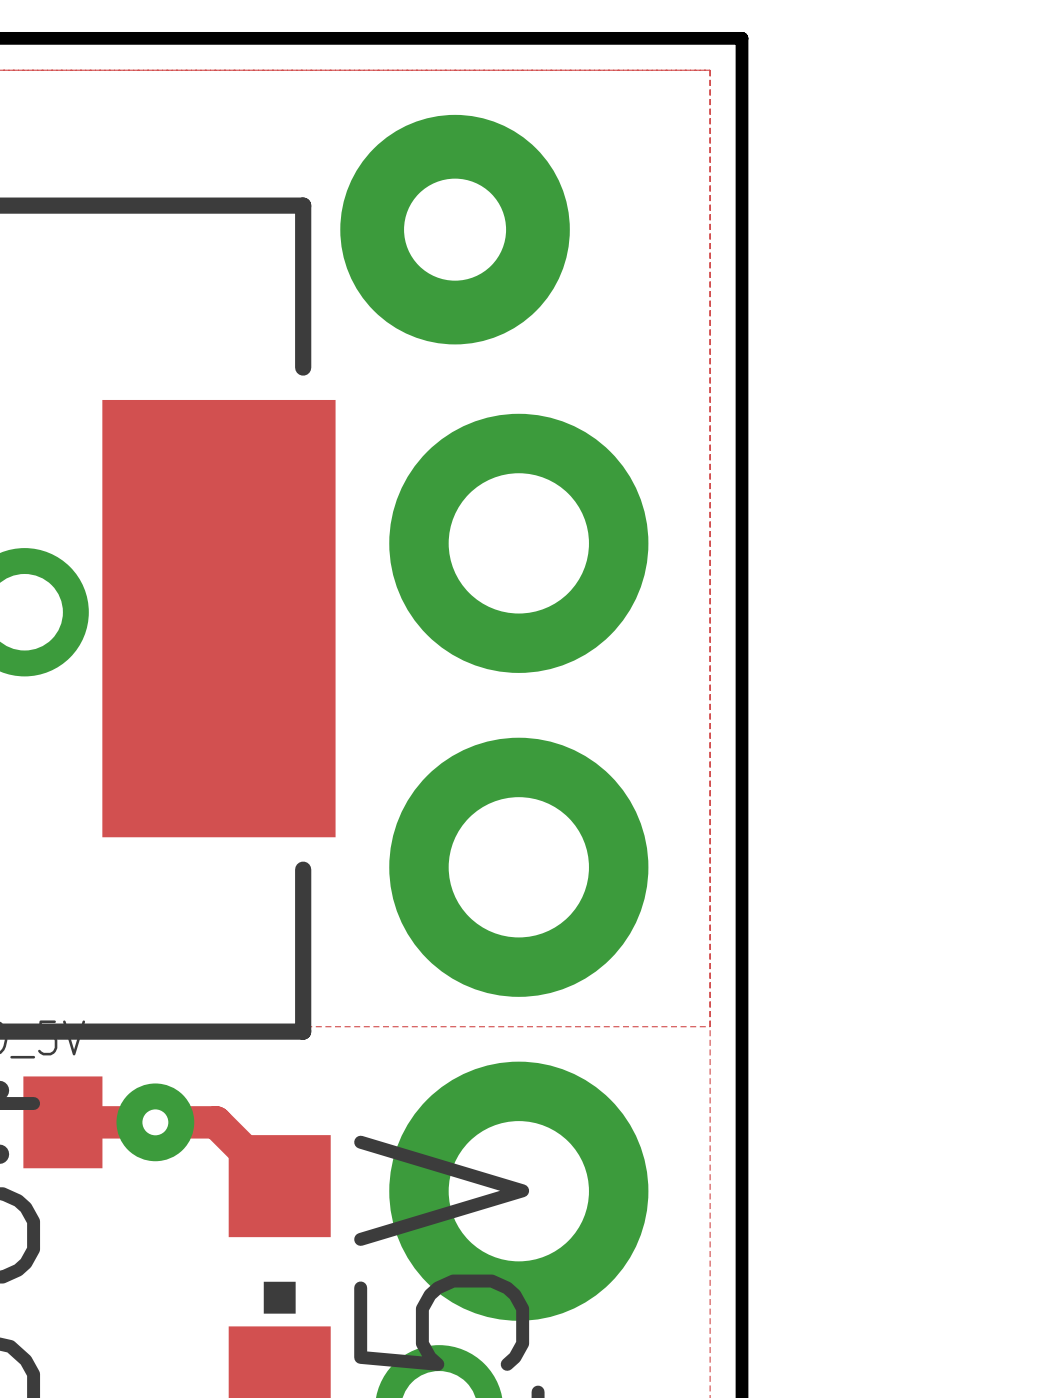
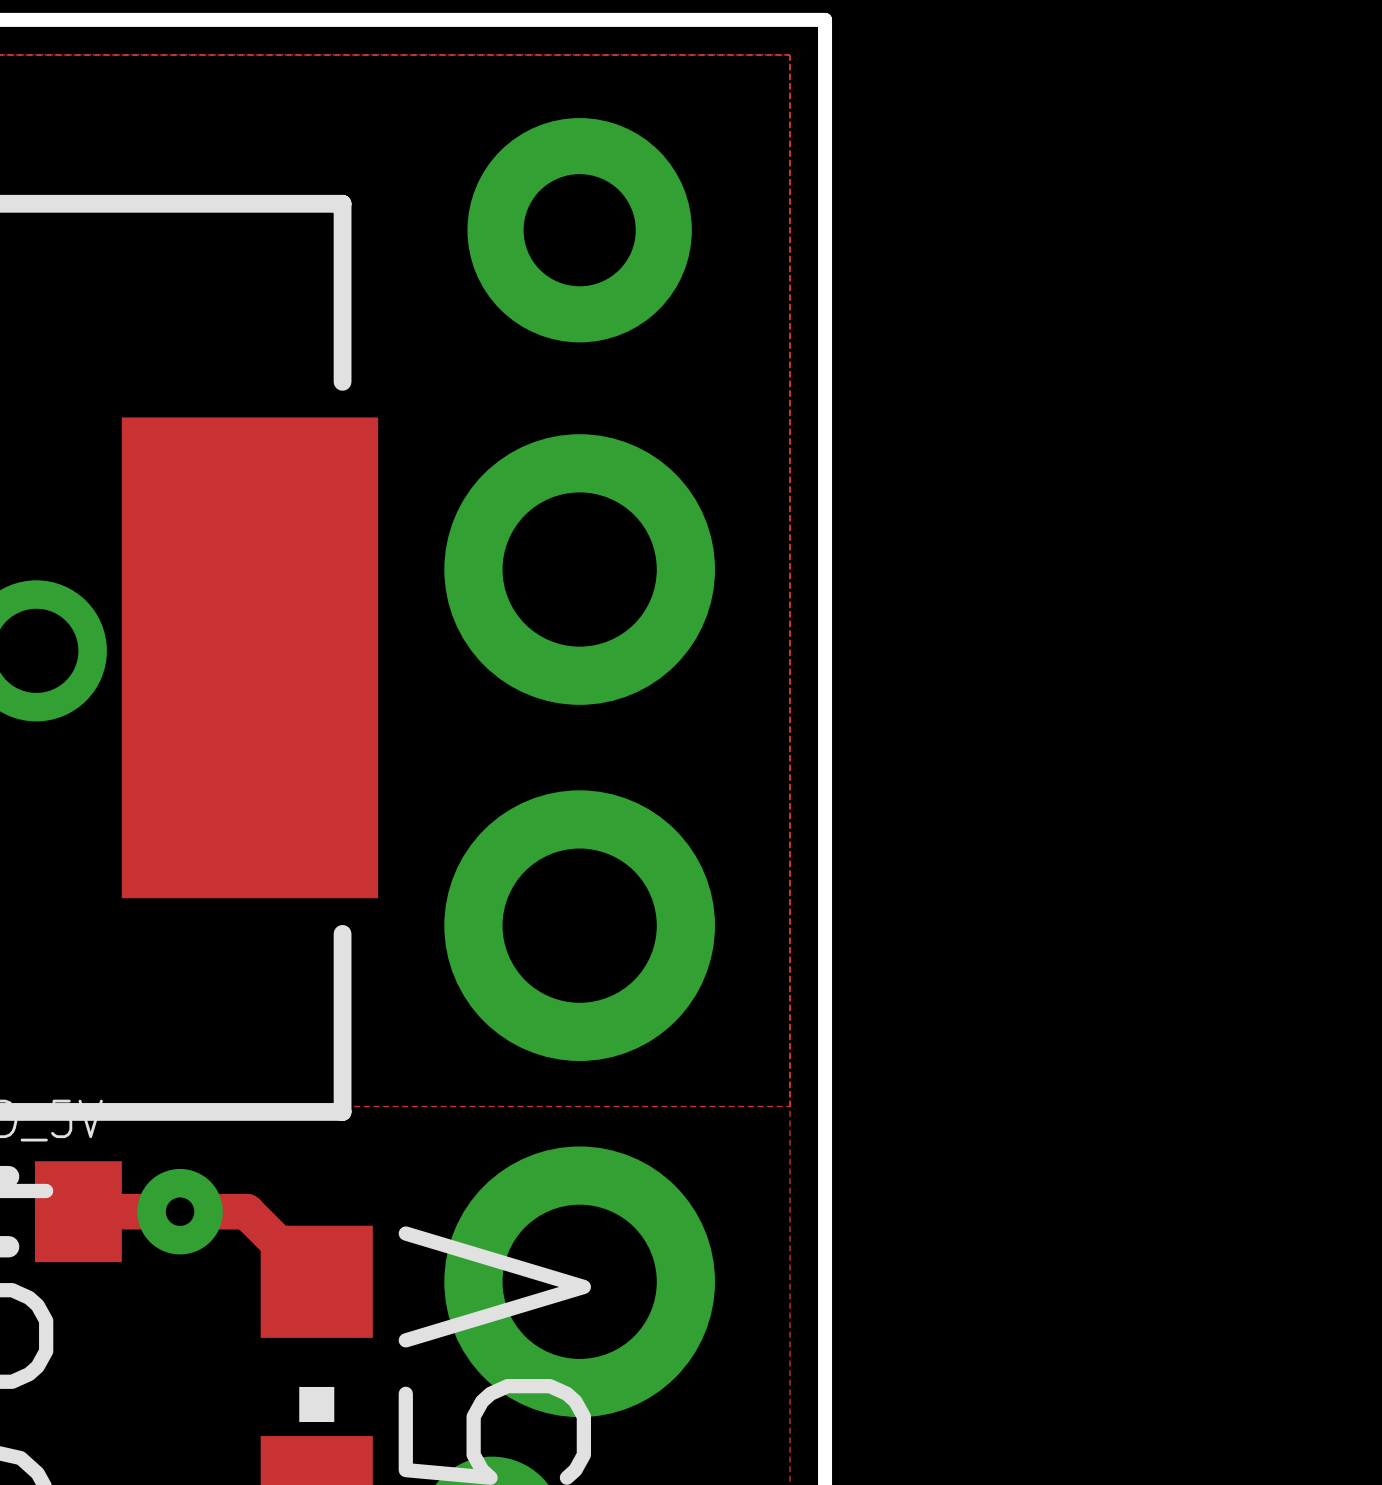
part: (455, 229) -> none
via: none -> (579, 230)
via: none -> (579, 569)
via: none -> (579, 925)
part: (518, 867) -> none
via: none -> (579, 1281)

